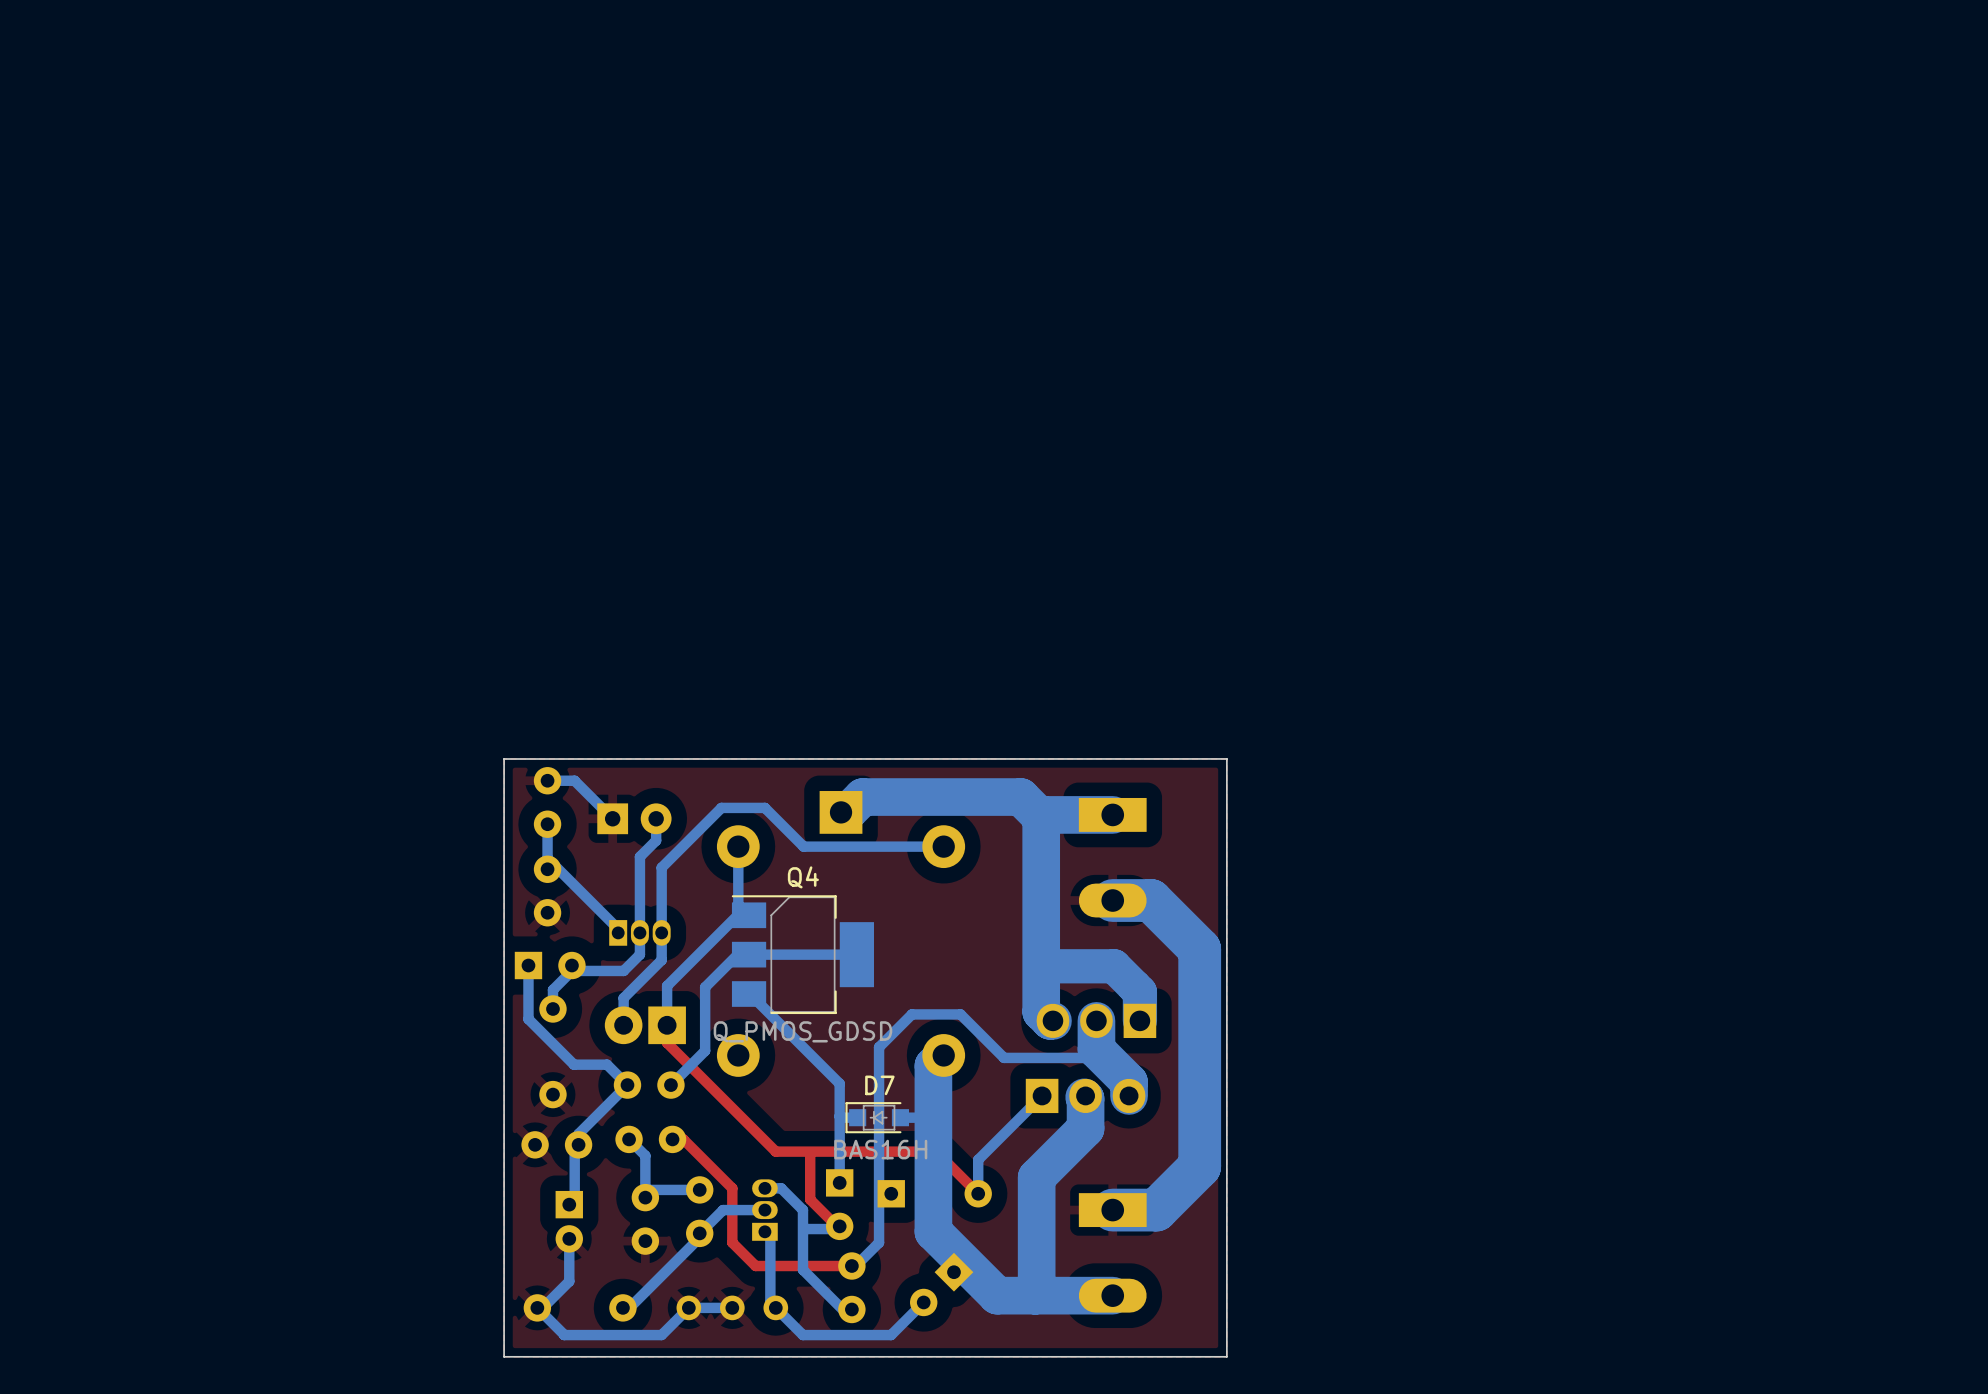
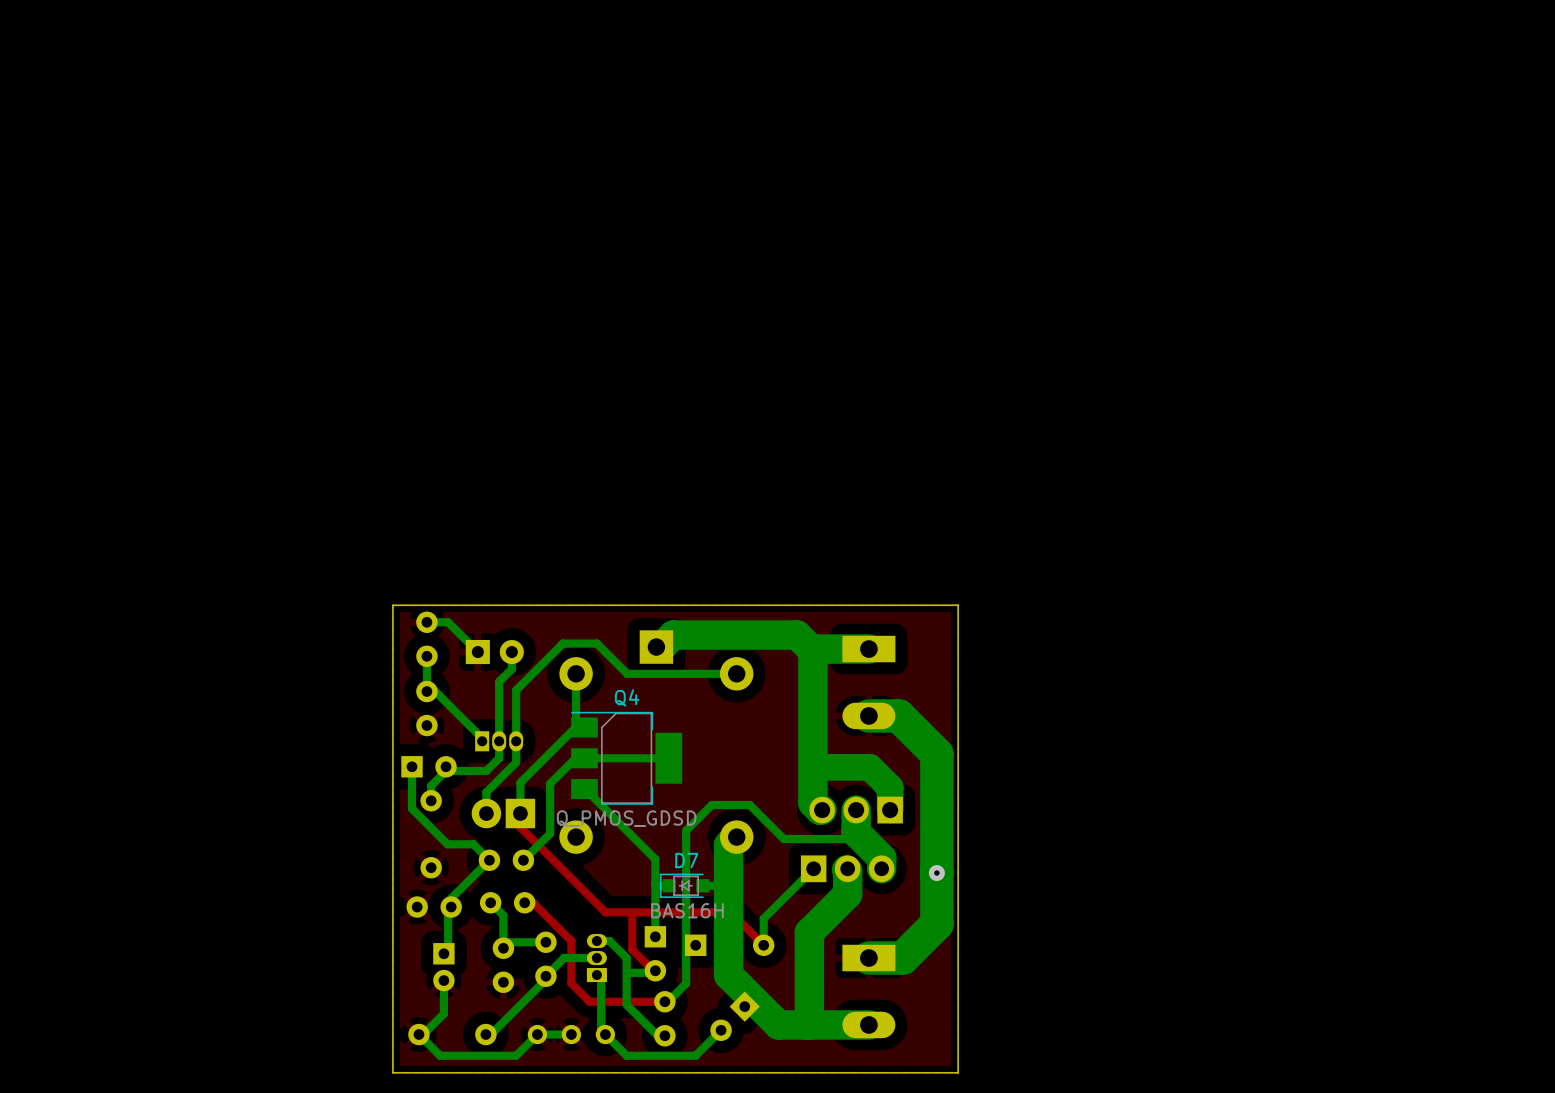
via: none -> (936, 873)

